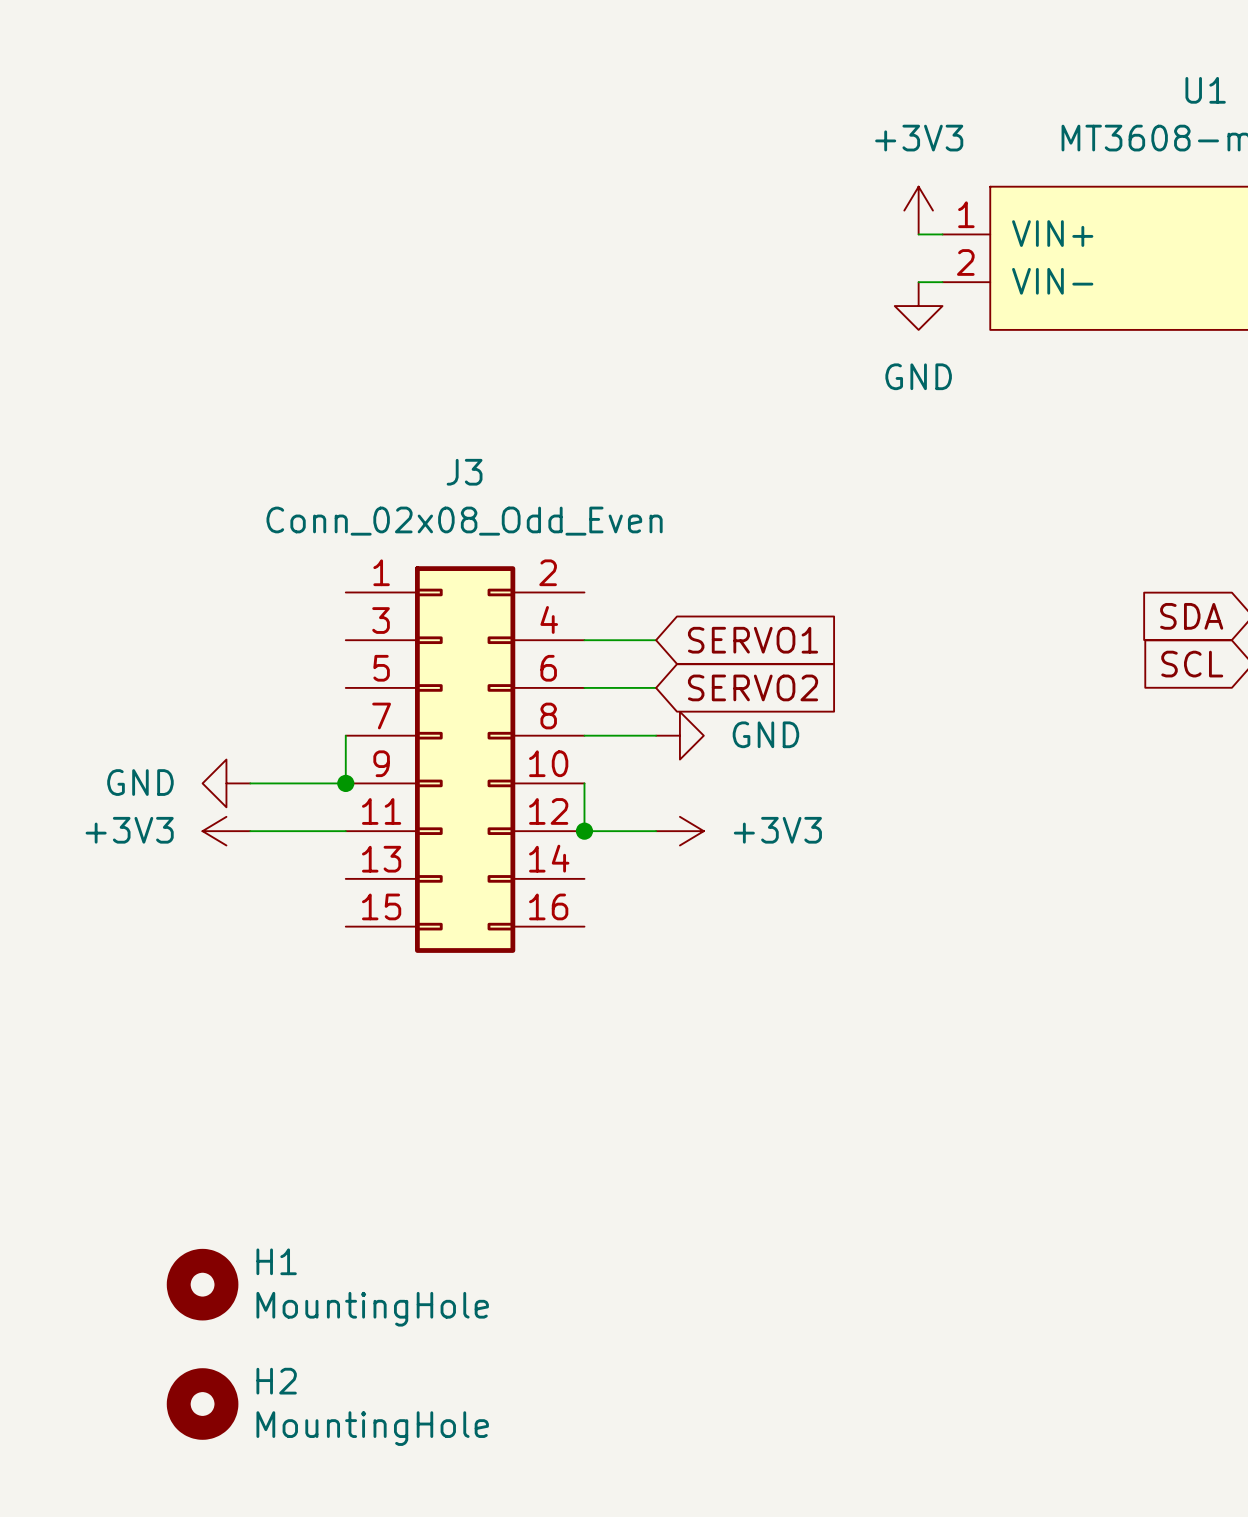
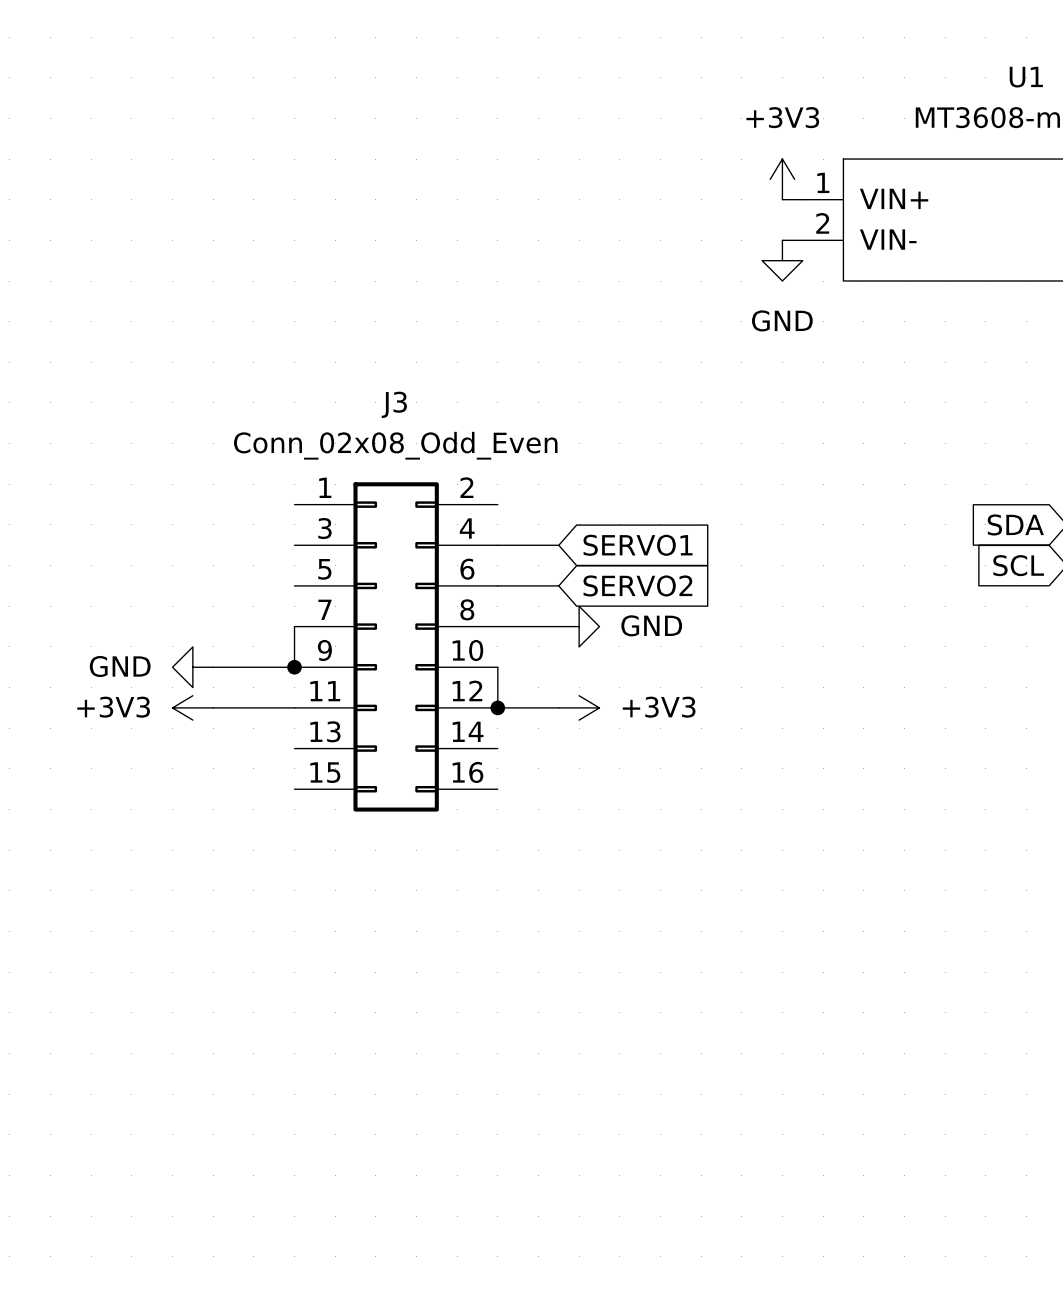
H1: MountingHole (202, 1284) -> none
H2: MountingHole (202, 1404) -> none

